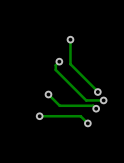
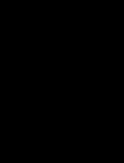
track: (70, 39) (70, 64) (97, 92) -> none
via: (70, 39) -> none
track: (59, 61) (55, 65) (55, 69) (86, 100) (103, 100) -> none
via: (59, 61) -> none
via: (97, 92) -> none
track: (48, 94) (59, 105) (93, 105) (96, 108) -> none
via: (48, 94) -> none
via: (103, 100) -> none
via: (96, 108) -> none
track: (39, 116) (80, 116) (87, 123) -> none
via: (39, 116) -> none
via: (87, 123) -> none

